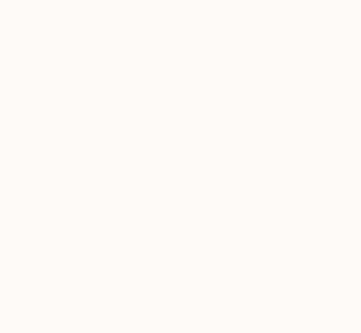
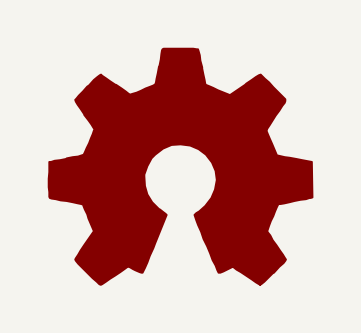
part: none -> (180, 166)

